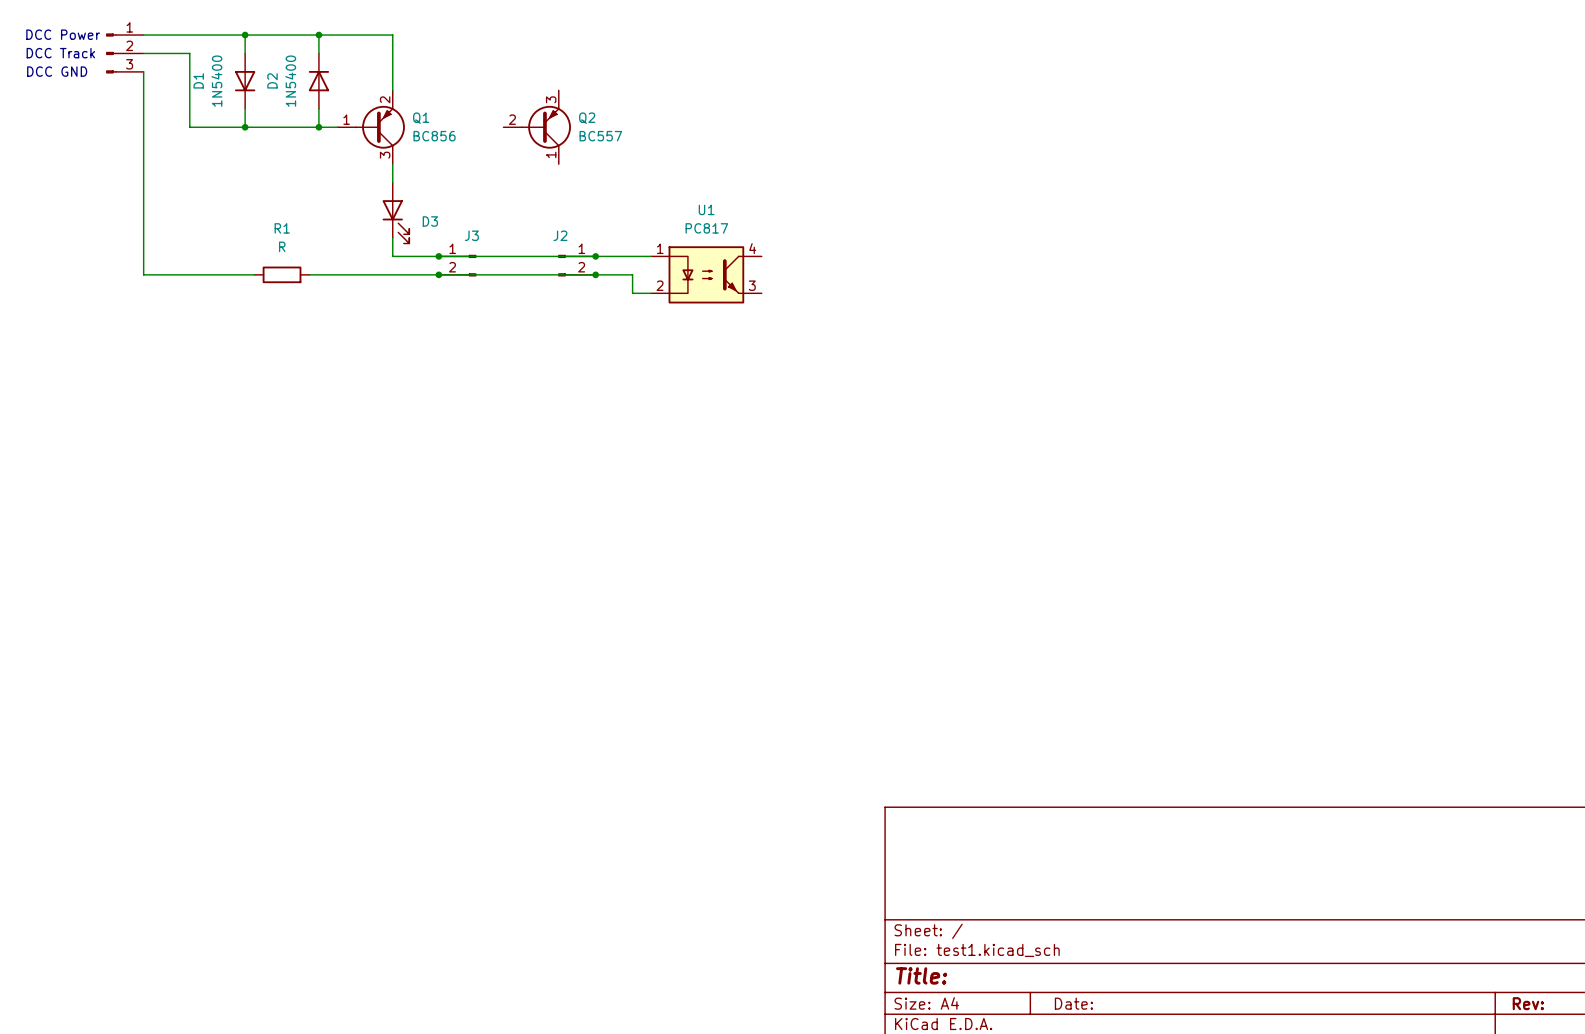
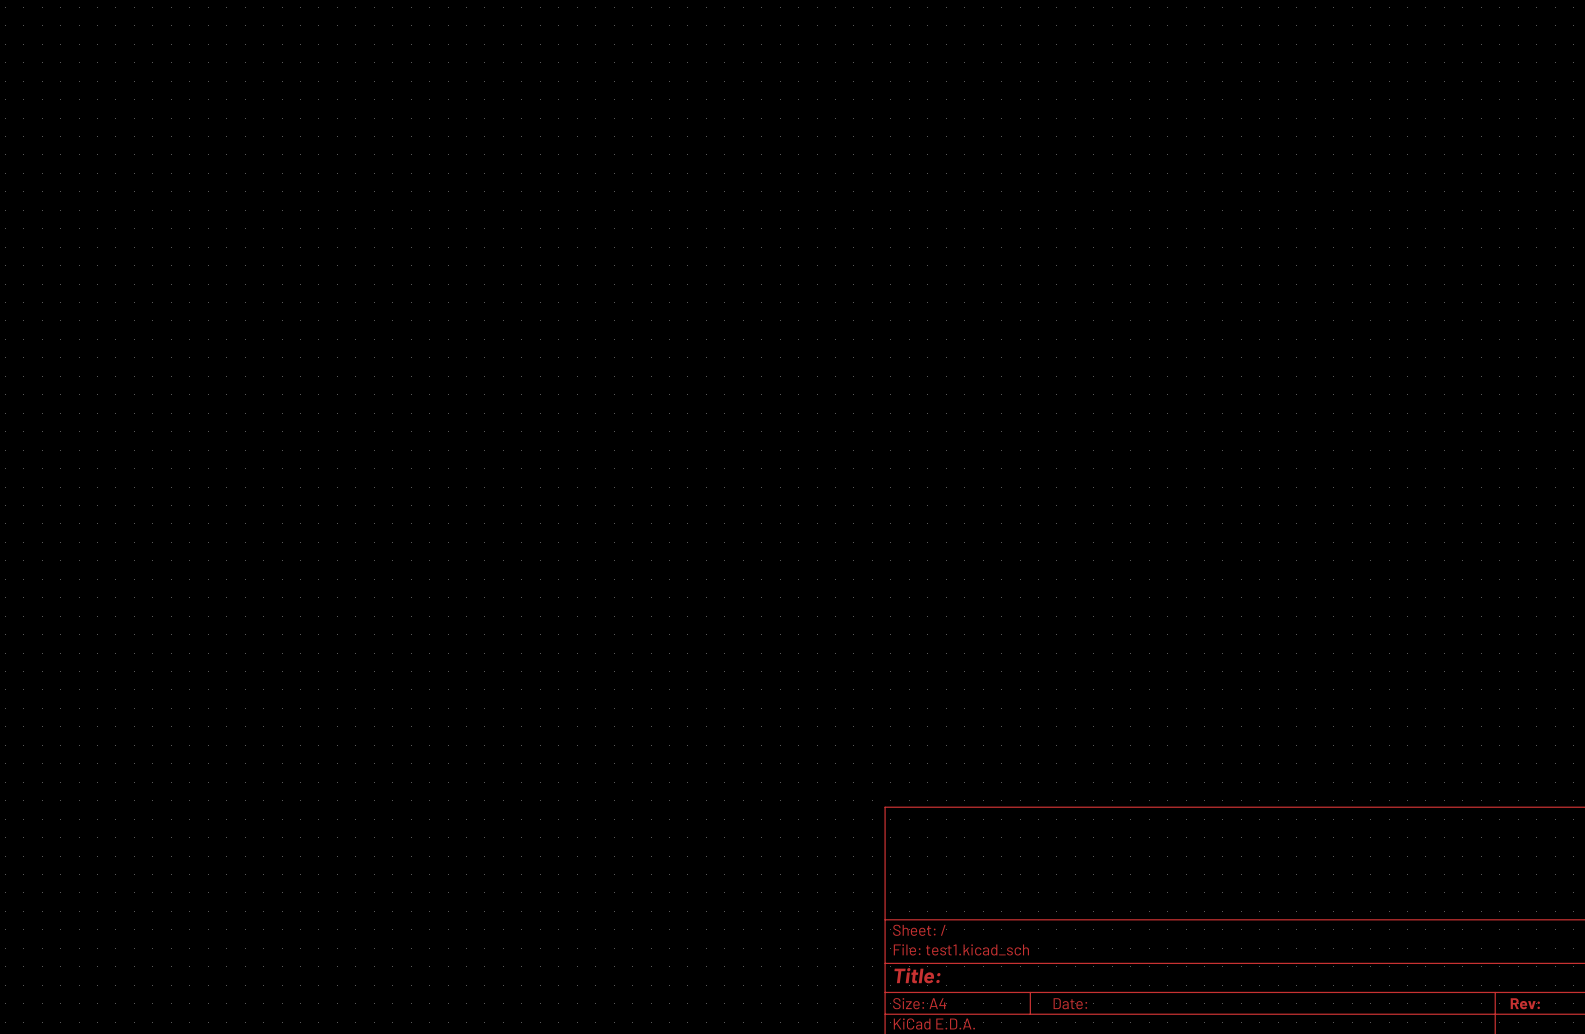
text: DCC Power (63, 34) -> none
wire: (143, 35) (392, 35) (392, 90) -> none
wire: (245, 35) (245, 53) -> none
junction: (245, 35) -> none
wire: (318, 35) (318, 53) -> none
junction: (318, 35) -> none
text: DCC Track (60, 53) -> none
part: (124, 53) -> none
wire: (143, 53) (189, 53) (189, 127) (337, 127) -> none
text: DCC GND (57, 71) -> none
wire: (143, 71) (143, 274) (254, 274) -> none
D1: 1N5400 (245, 81) -> none
D2: 1N5400 (318, 81) -> none
wire: (245, 108) (245, 127) -> none
wire: (318, 108) (318, 127) -> none
junction: (245, 127) -> none
junction: (318, 127) -> none
Q1: BC856 (371, 127) -> none
Q2: BC557 (537, 127) -> none
wire: (392, 164) (392, 182) -> none
D3: (395, 213) -> none
wire: (392, 237) (392, 256) (651, 256) -> none
junction: (438, 256) -> none
junction: (595, 256) -> none
J3: (457, 265) -> none
J2: (576, 265) -> none
R1: R (282, 274) -> none
wire: (309, 274) (632, 274) (632, 293) (651, 293) -> none
junction: (438, 274) -> none
junction: (595, 274) -> none
U1: PC817 (706, 274) -> none

